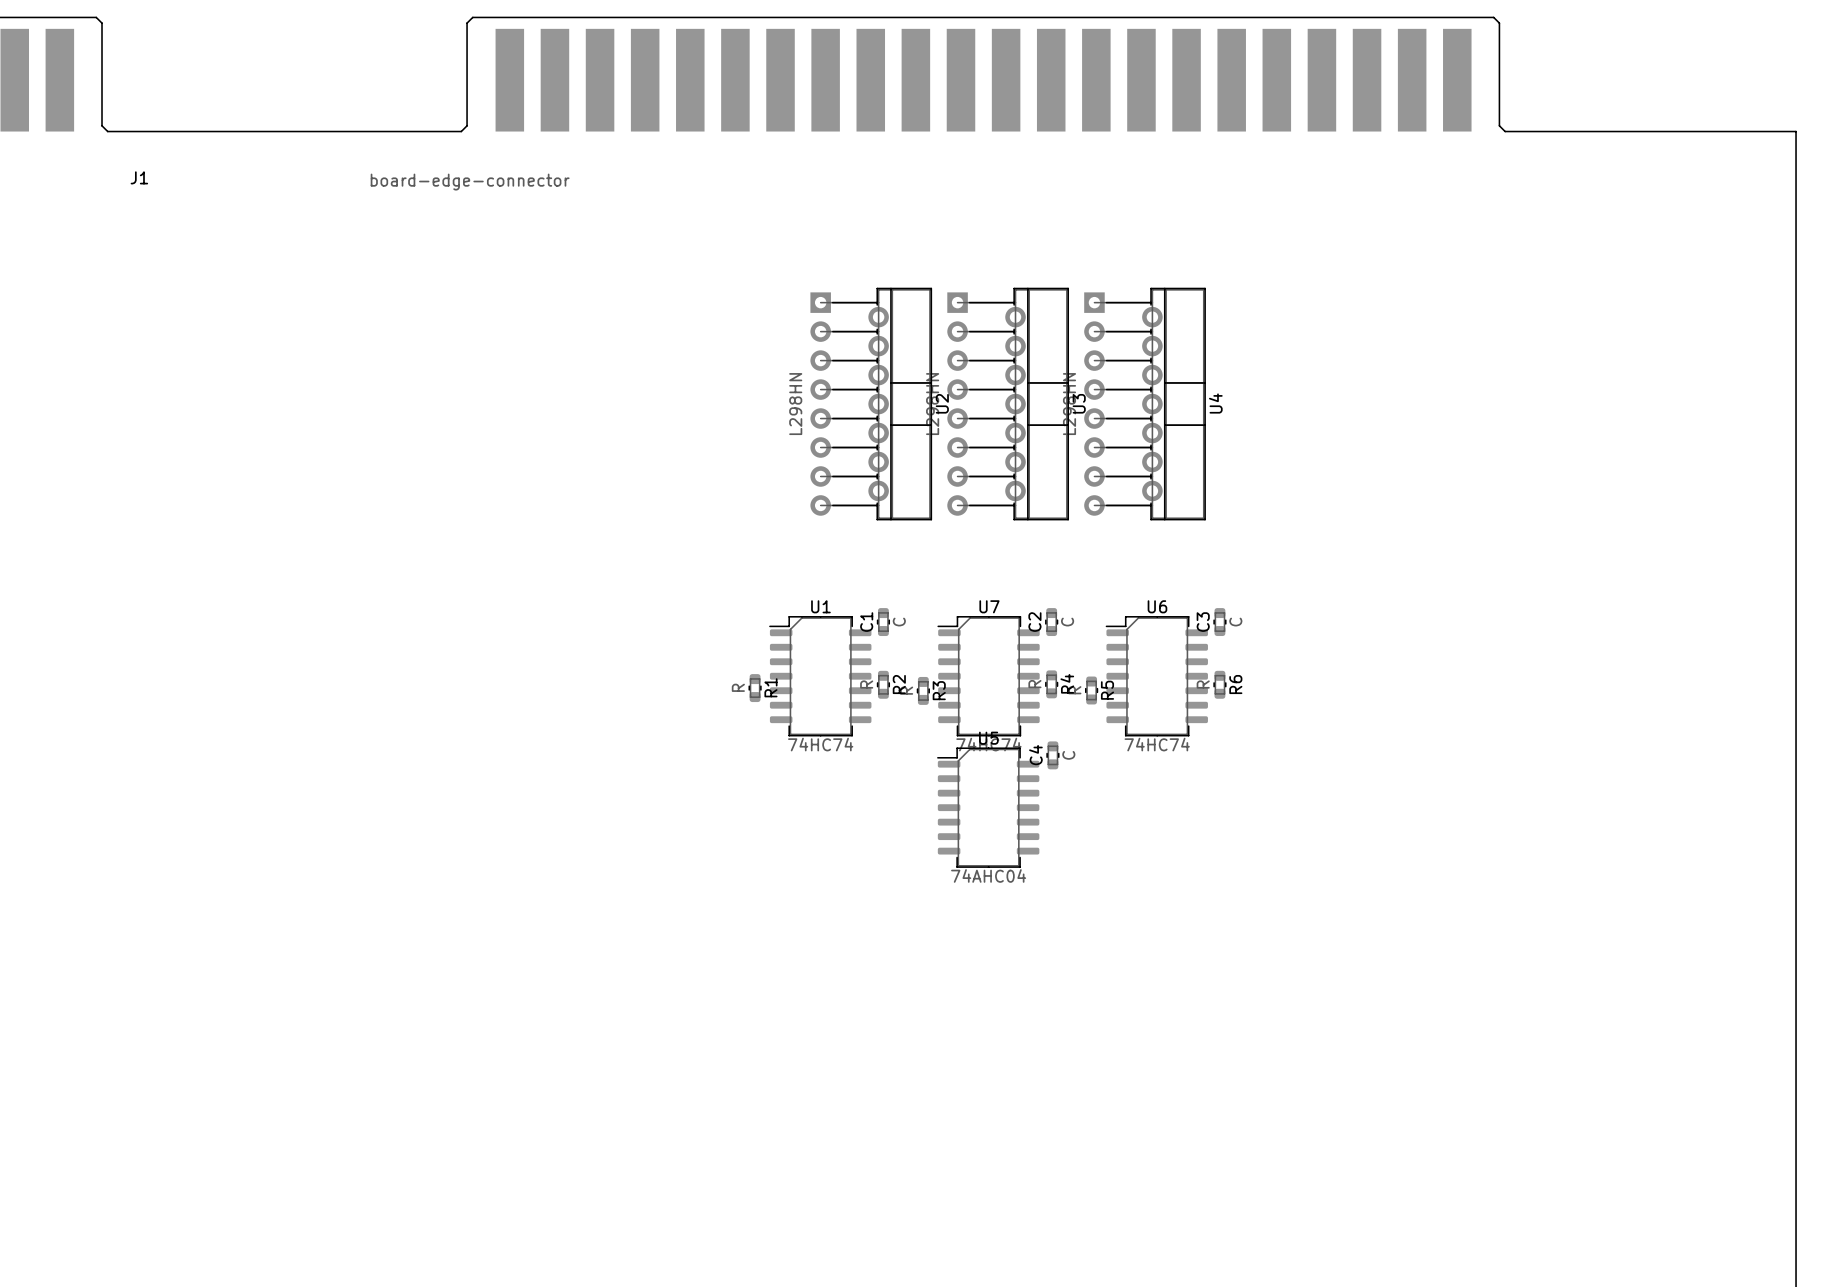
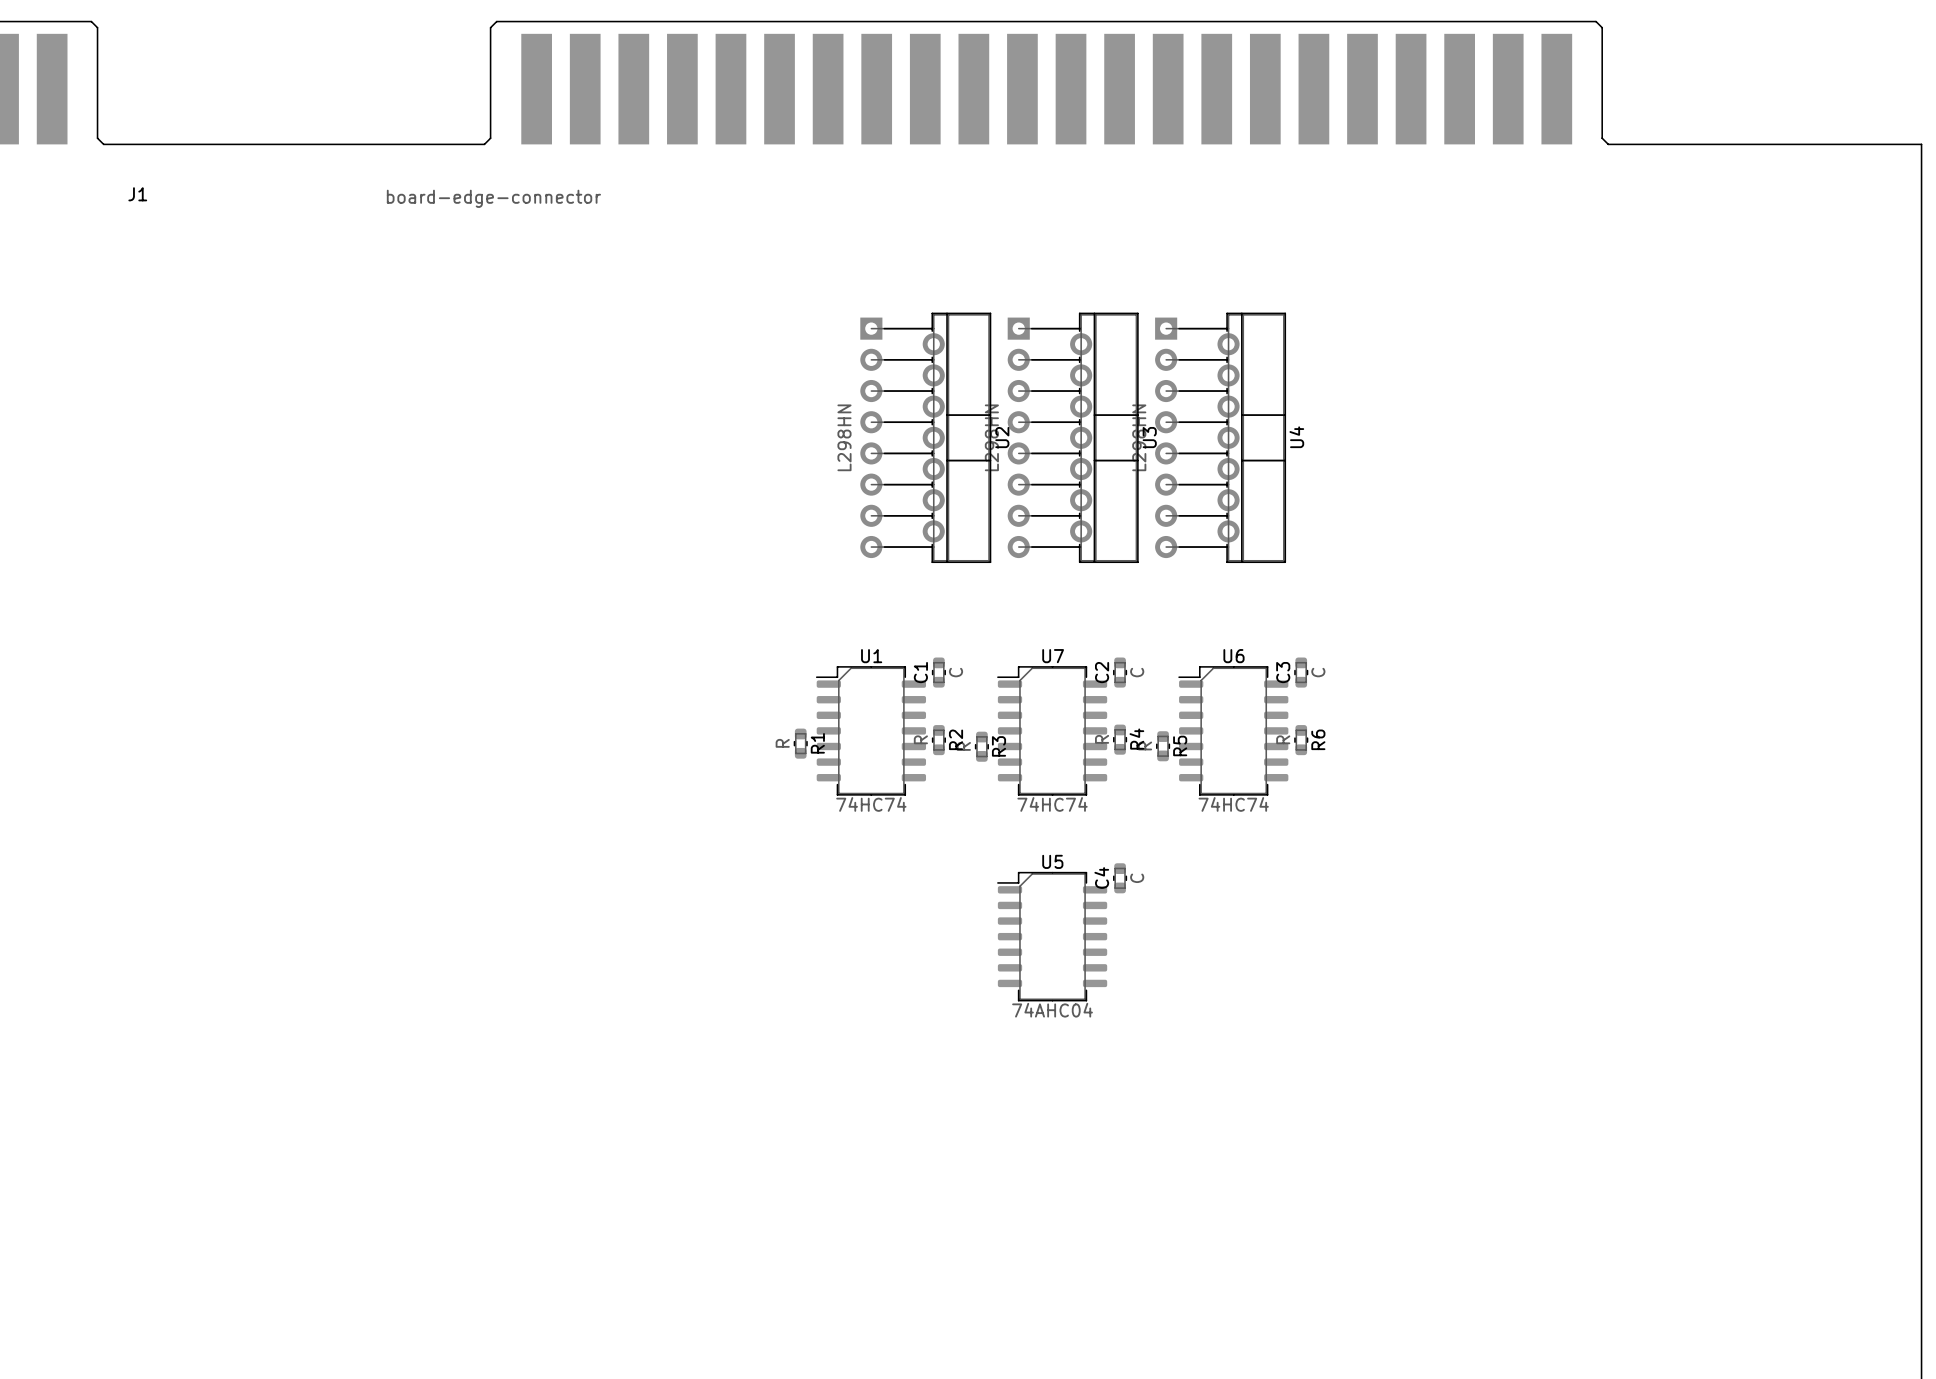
C4 position: (1052, 755) -> (1120, 878)
U5 position: (988, 807) -> (1052, 936)

